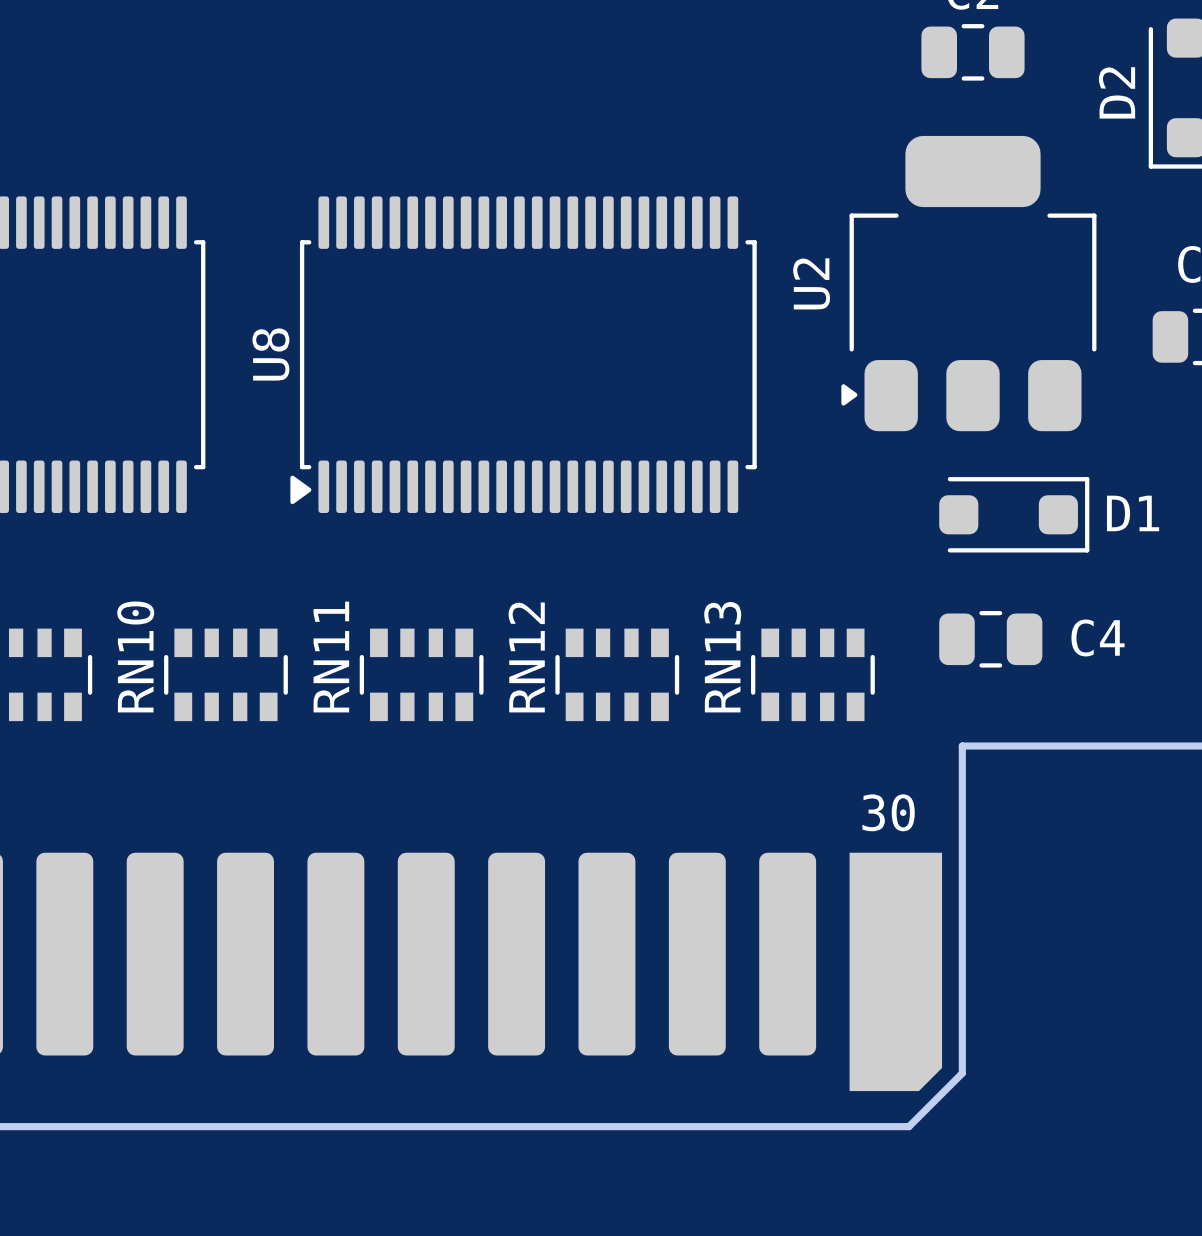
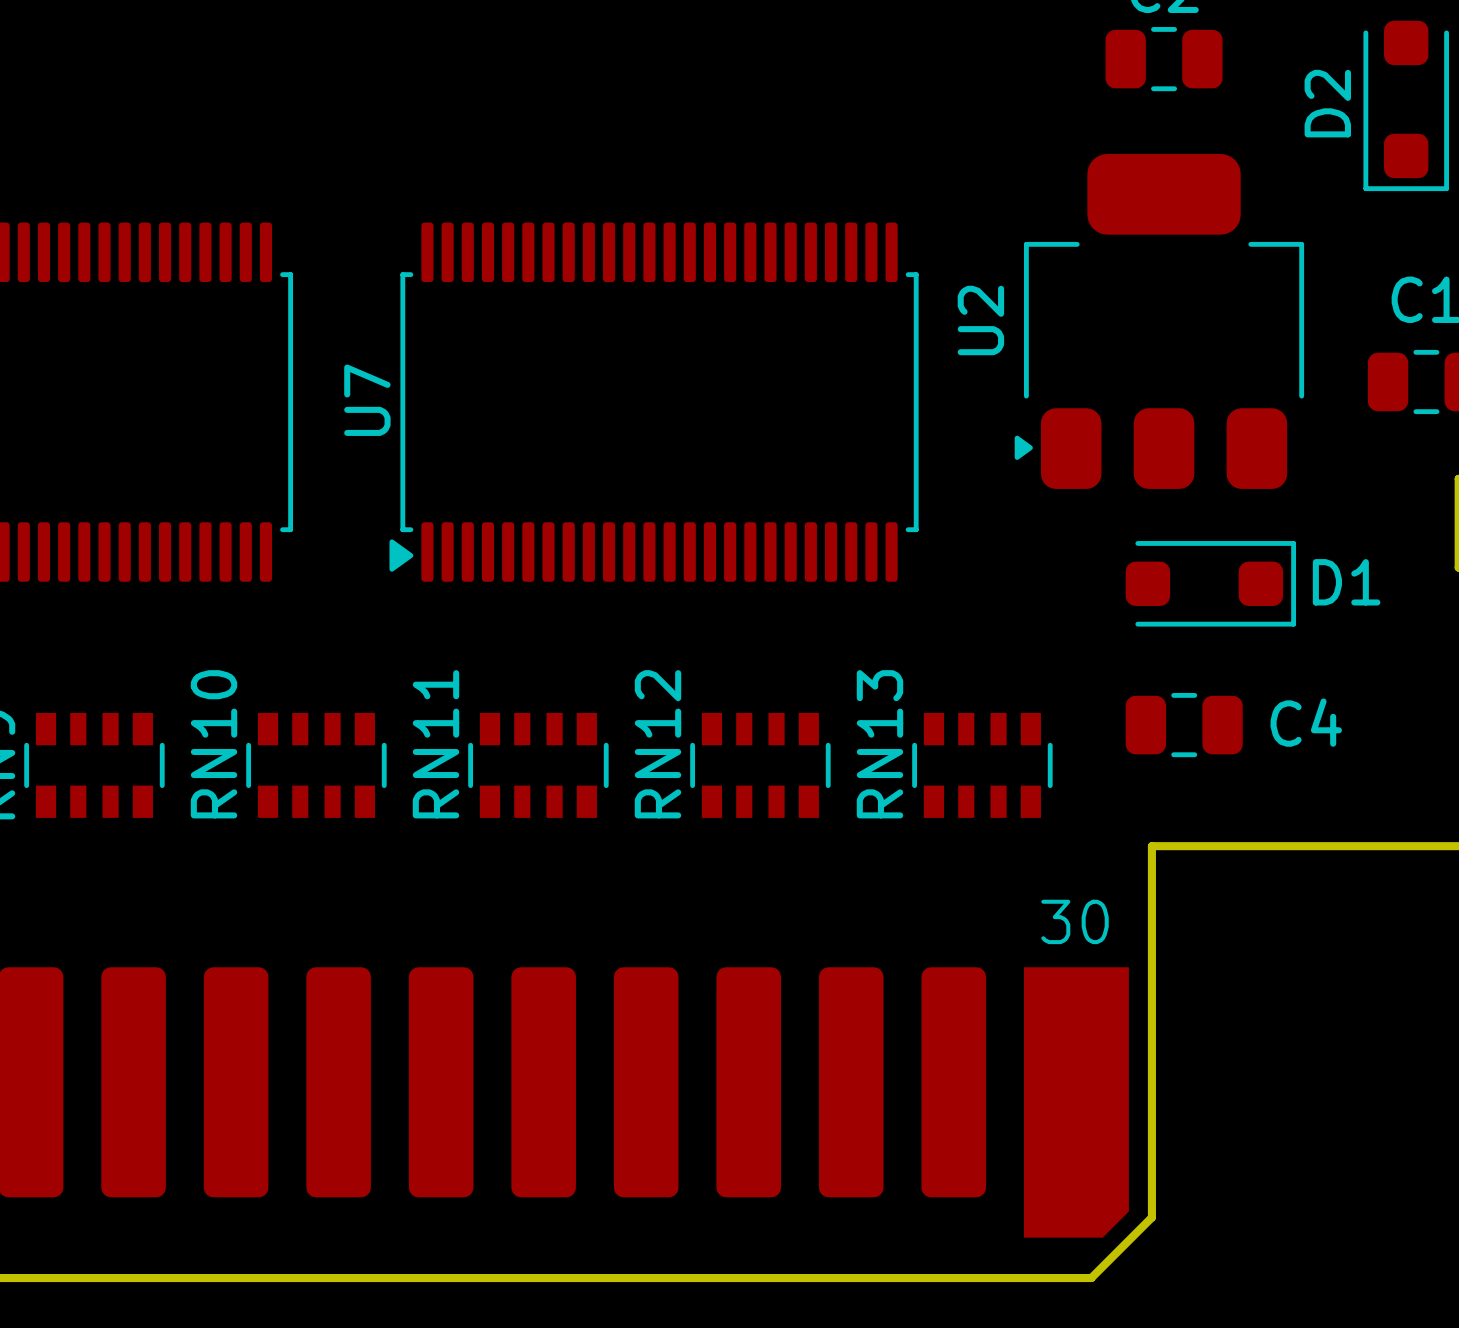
U8 name: U8 (270, 354) -> U7 (367, 400)

